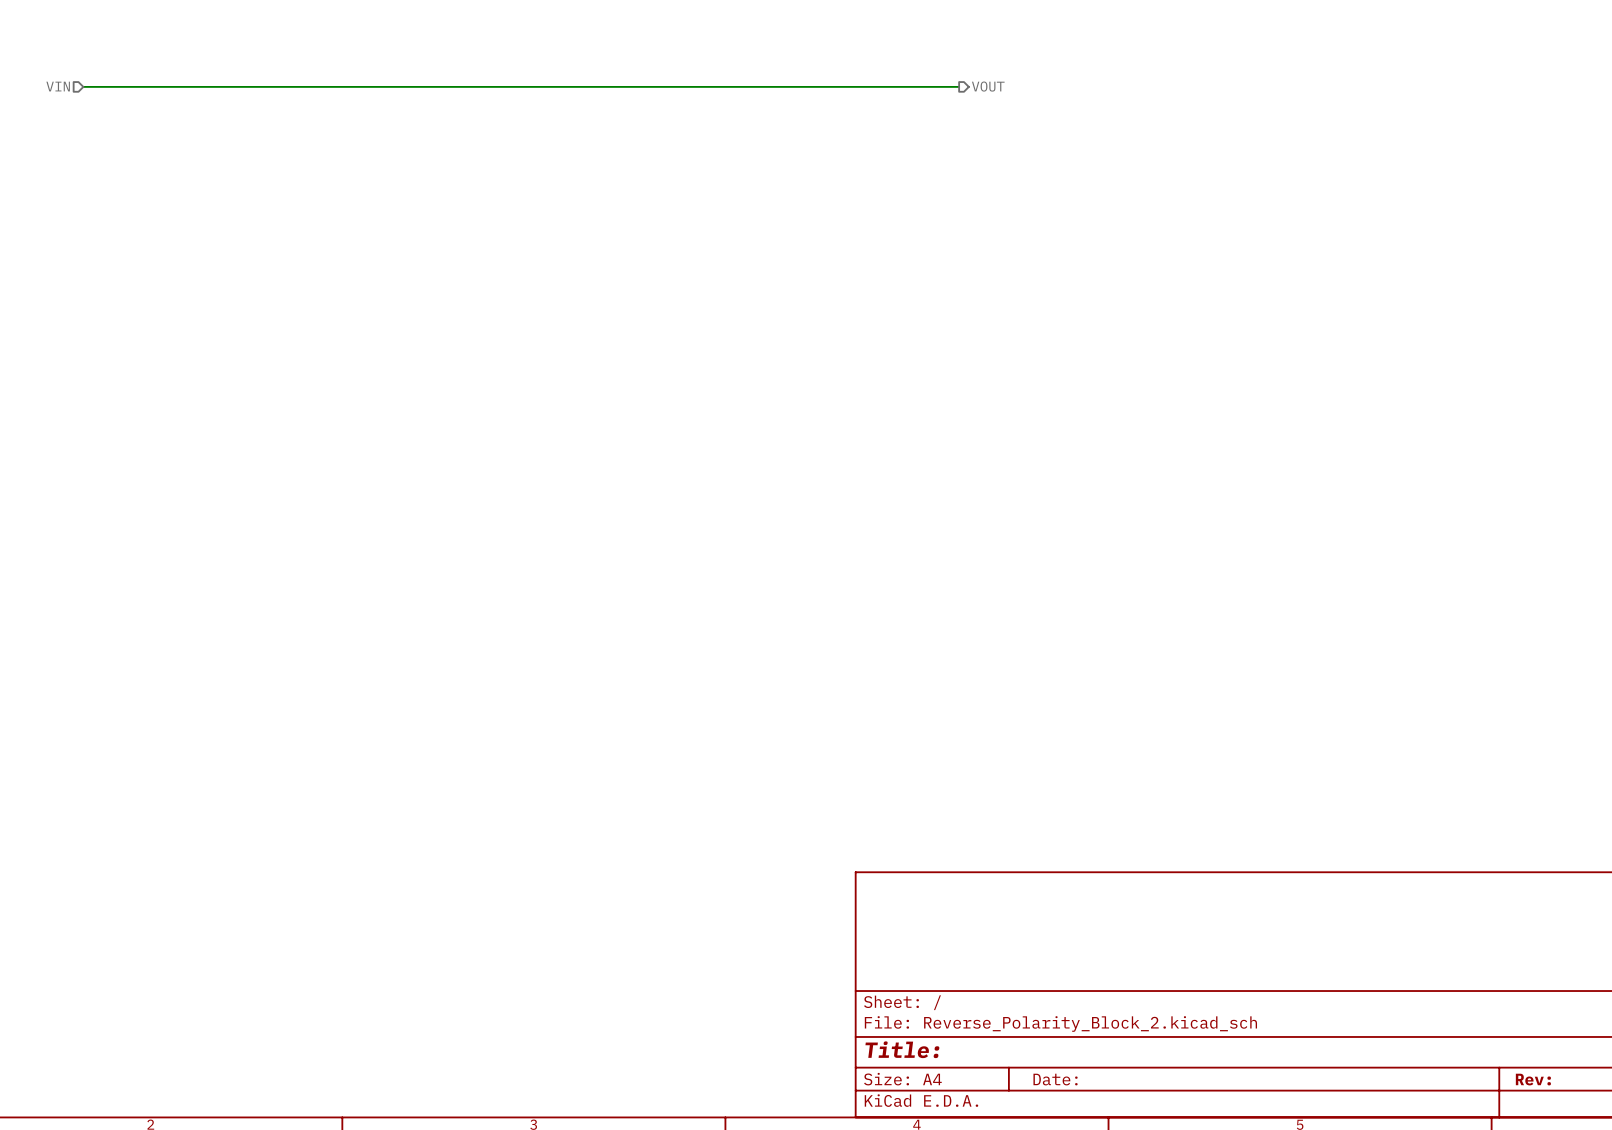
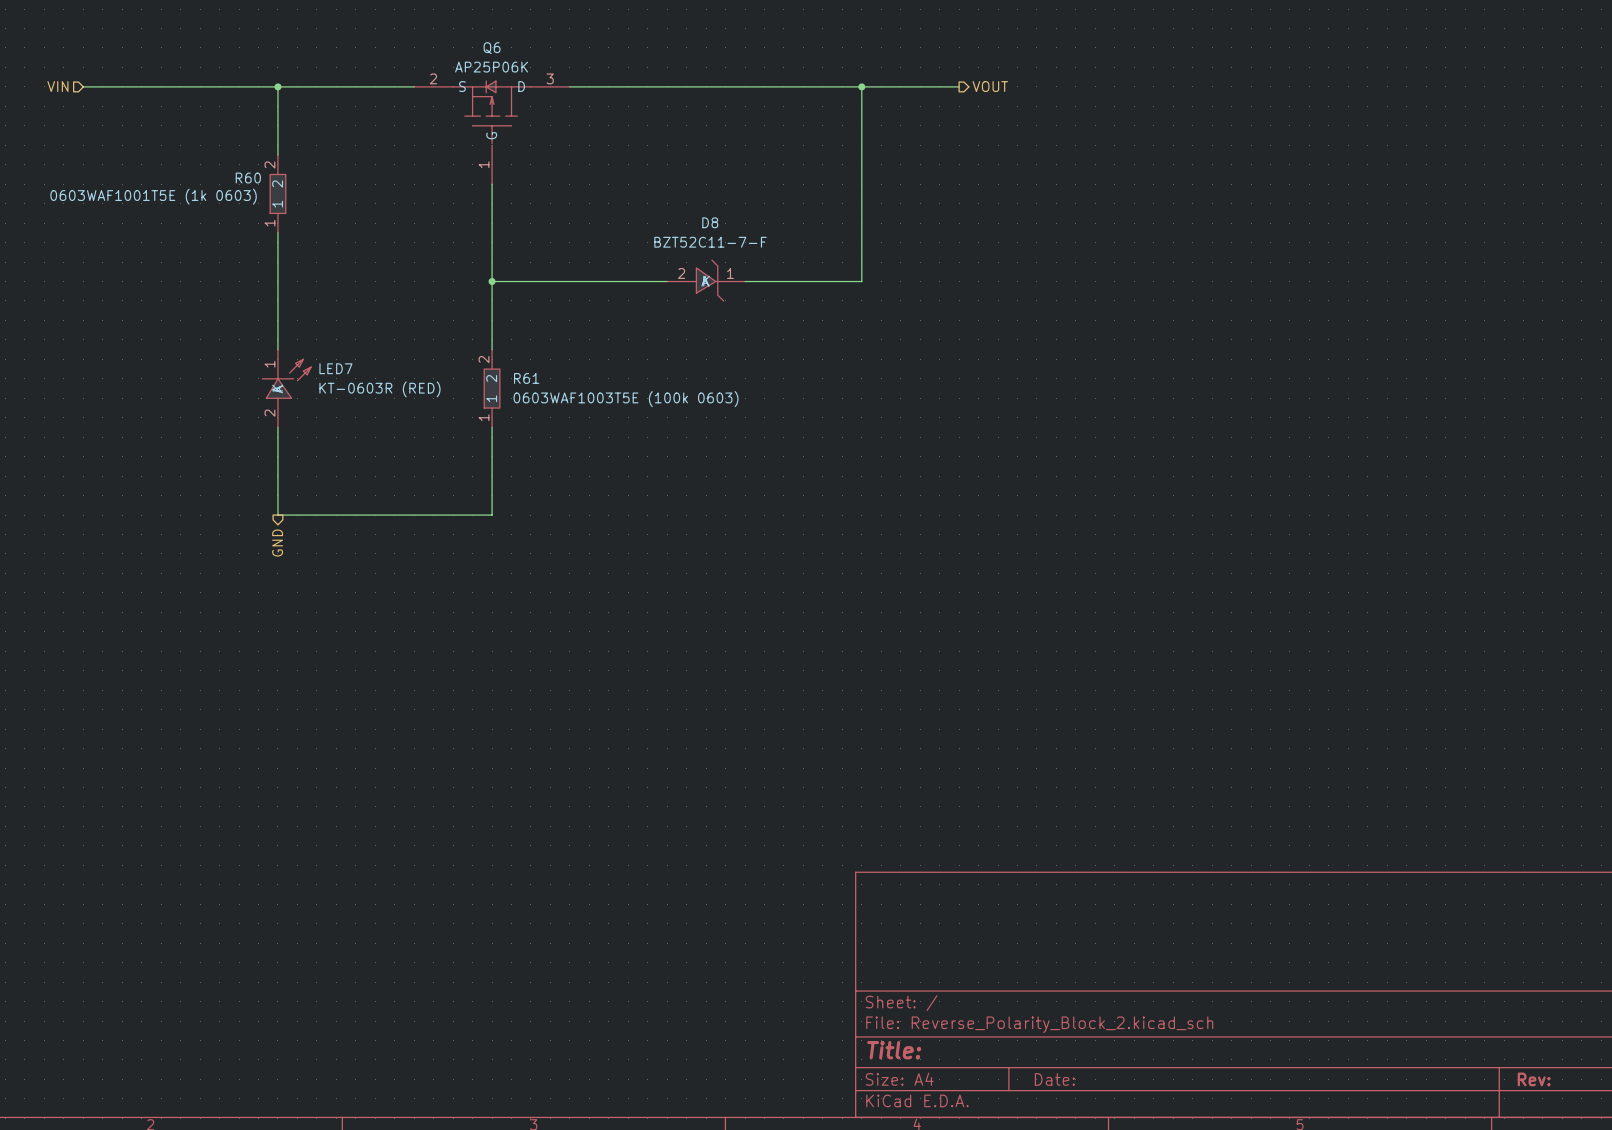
wire: none -> (277, 86) (277, 155)
junction: none -> (277, 86)
wire: none -> (861, 86) (861, 281) (745, 281)
junction: none -> (861, 86)
Q6: none -> AP25P06K (492, 132)
wire: none -> (492, 184) (492, 349)
R60: none -> 0603WAF1001T5E (1k 0603) (277, 193)
wire: none -> (277, 232) (277, 349)
D8: none -> BZT52C11-7-F (706, 280)
wire: none -> (492, 281) (667, 281)
junction: none -> (492, 281)
LED7: none -> KT-0603R (RED) (286, 388)
R61: none -> 0603WAF1003T5E (100k 0603) (492, 388)
wire: none -> (277, 427) (277, 515) (492, 515) (492, 427)
hierarchical label: none -> GND (277, 543)

